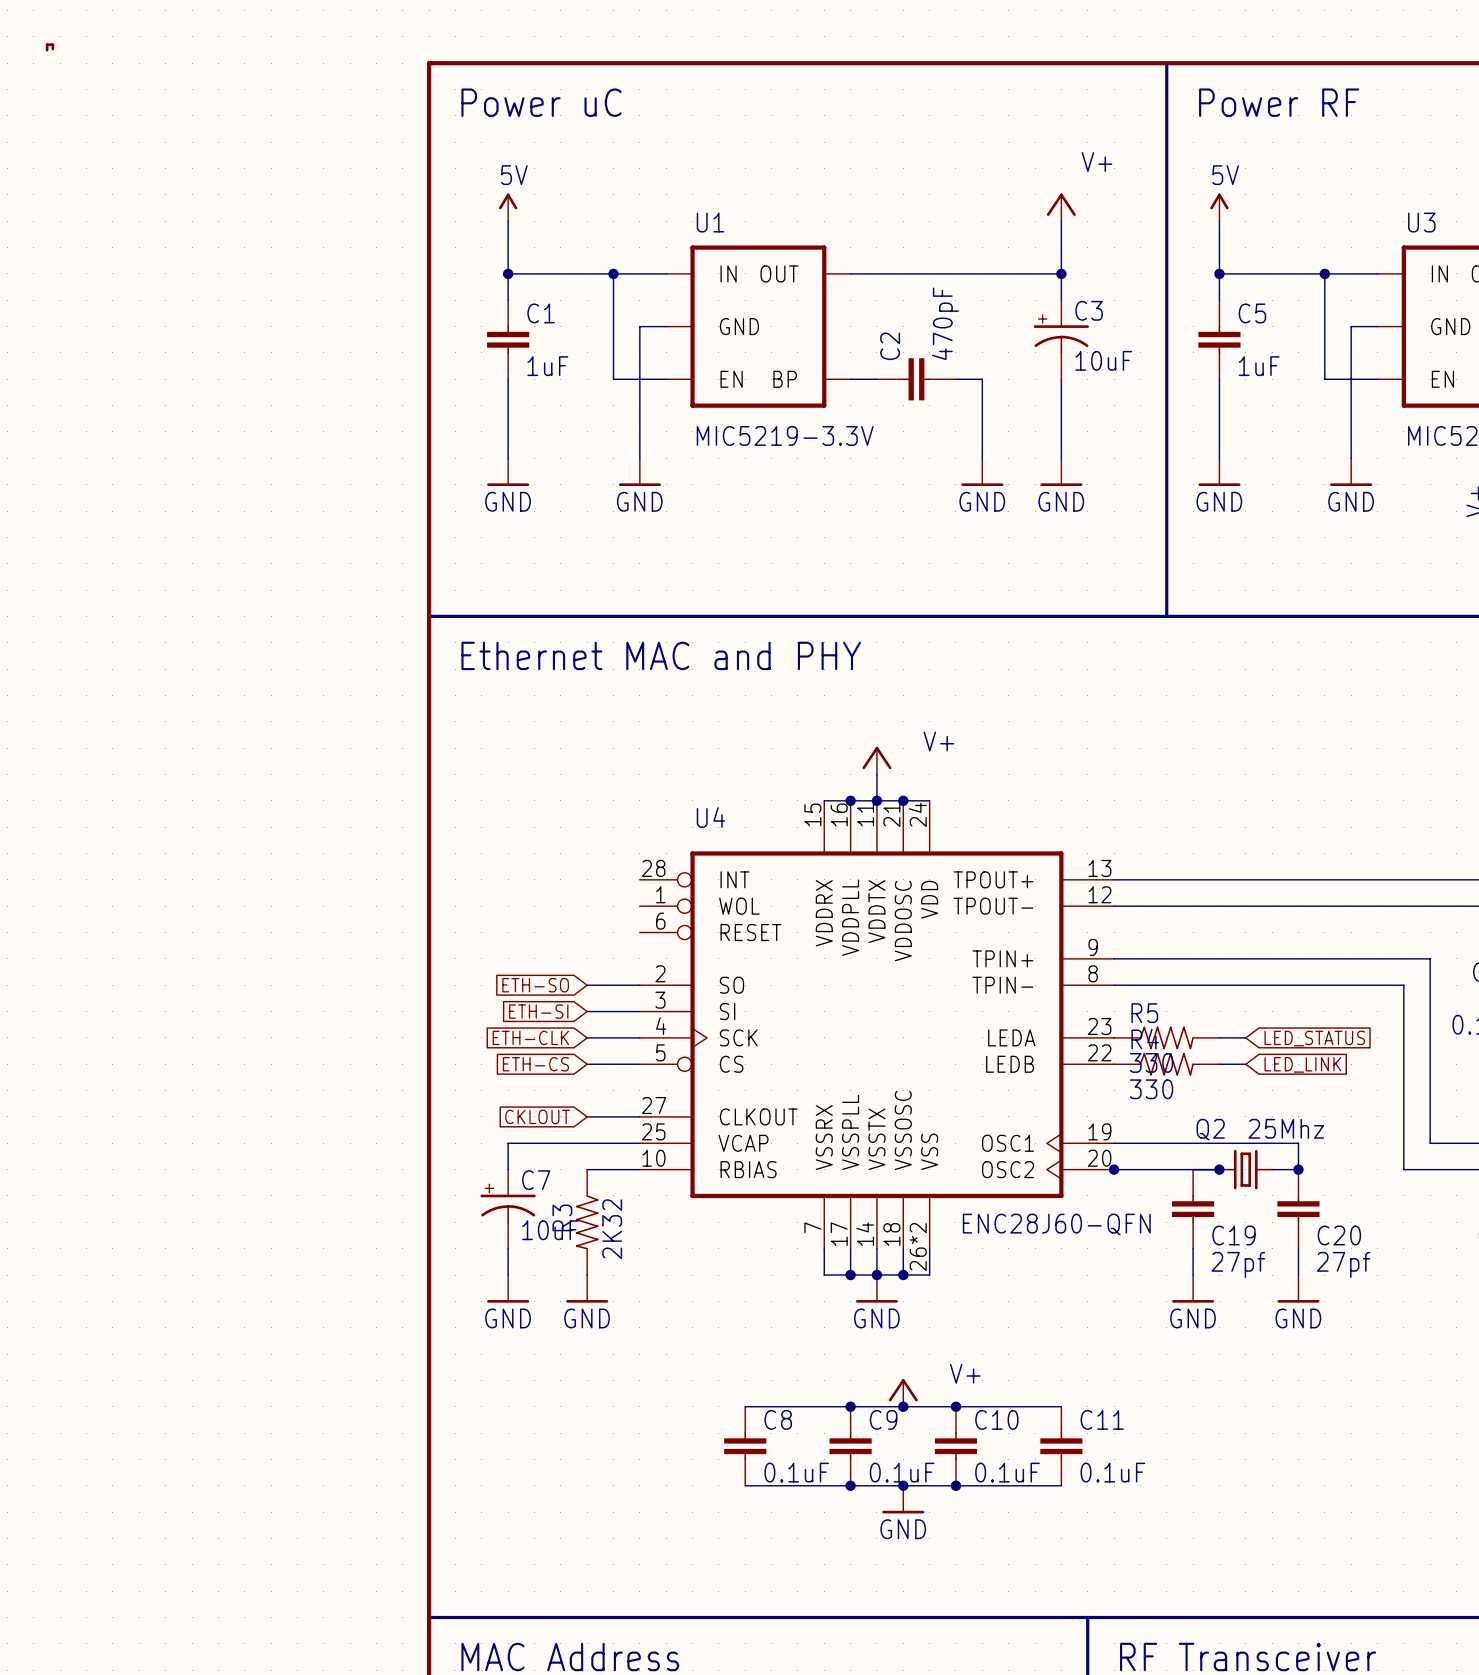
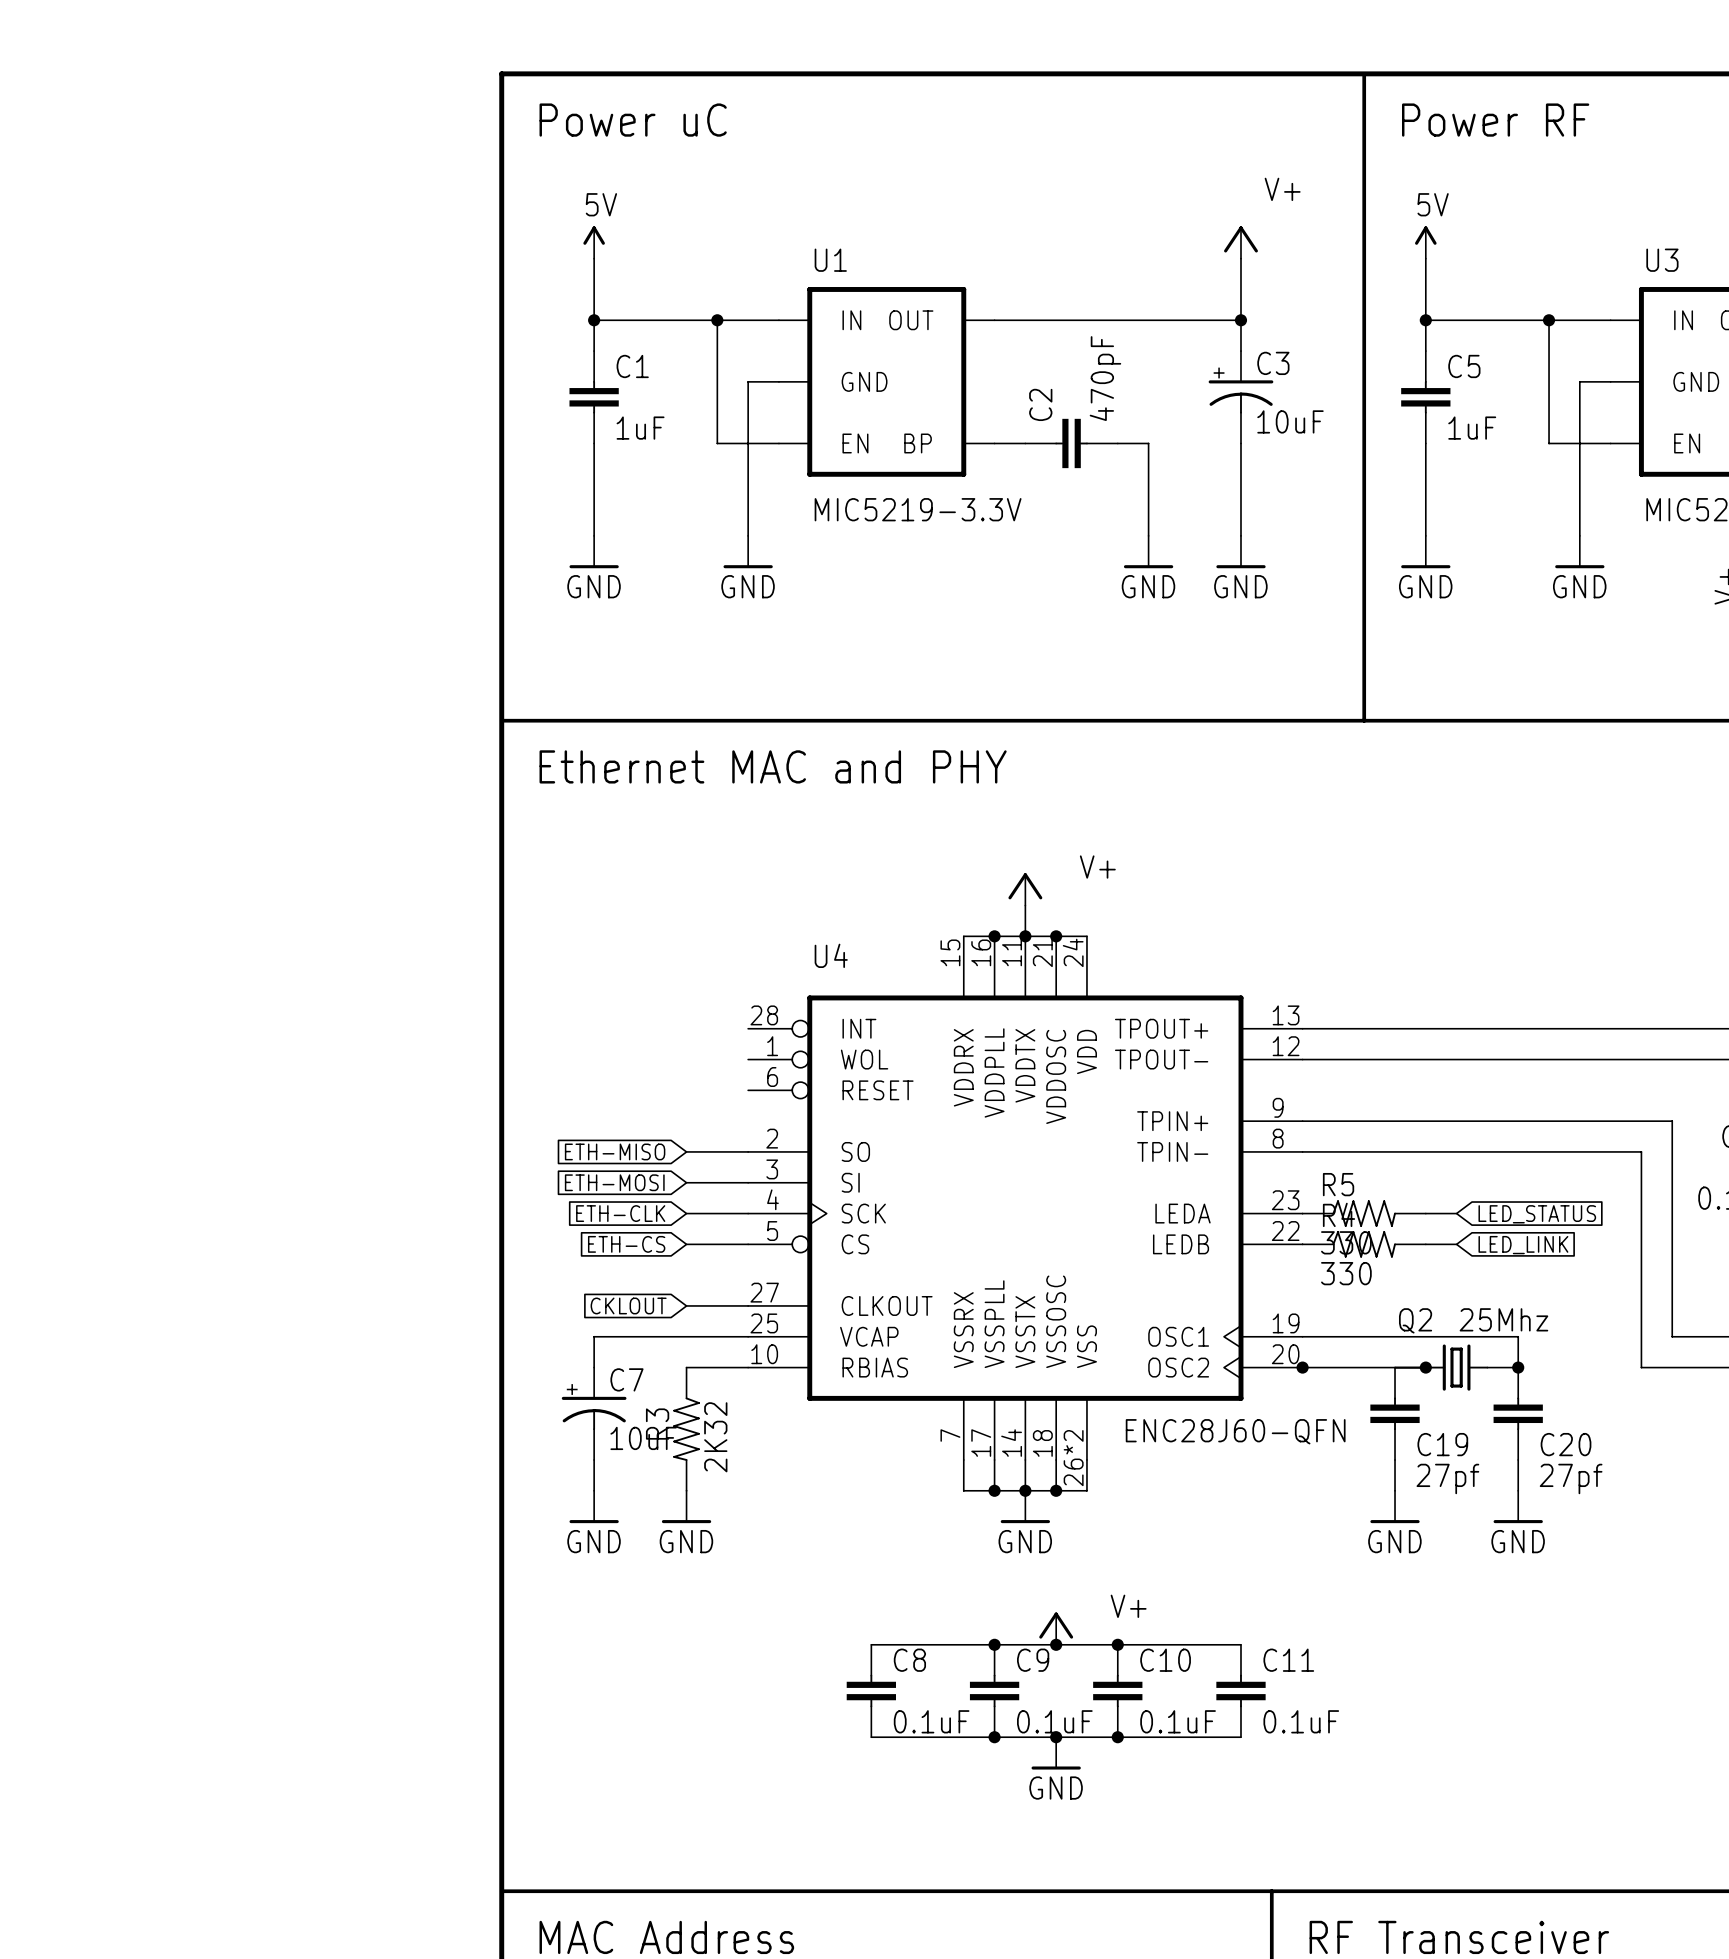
line: (52, 49) (52, 44) (47, 44) (47, 50) -> none
global label: ETH-SO (535, 985) -> ETH-MISO (615, 1151)
global label: ETH-SI (538, 1011) -> ETH-MOSI (614, 1182)

